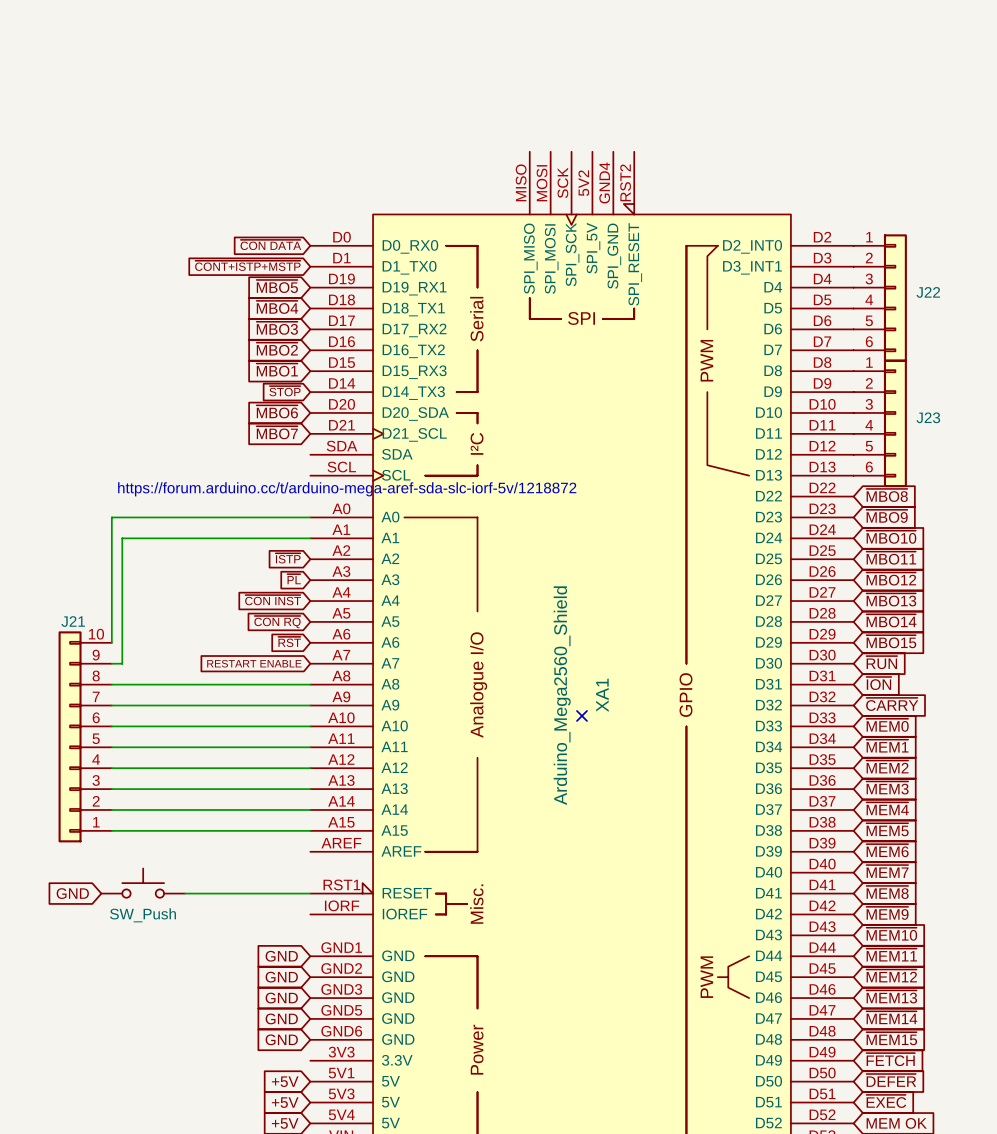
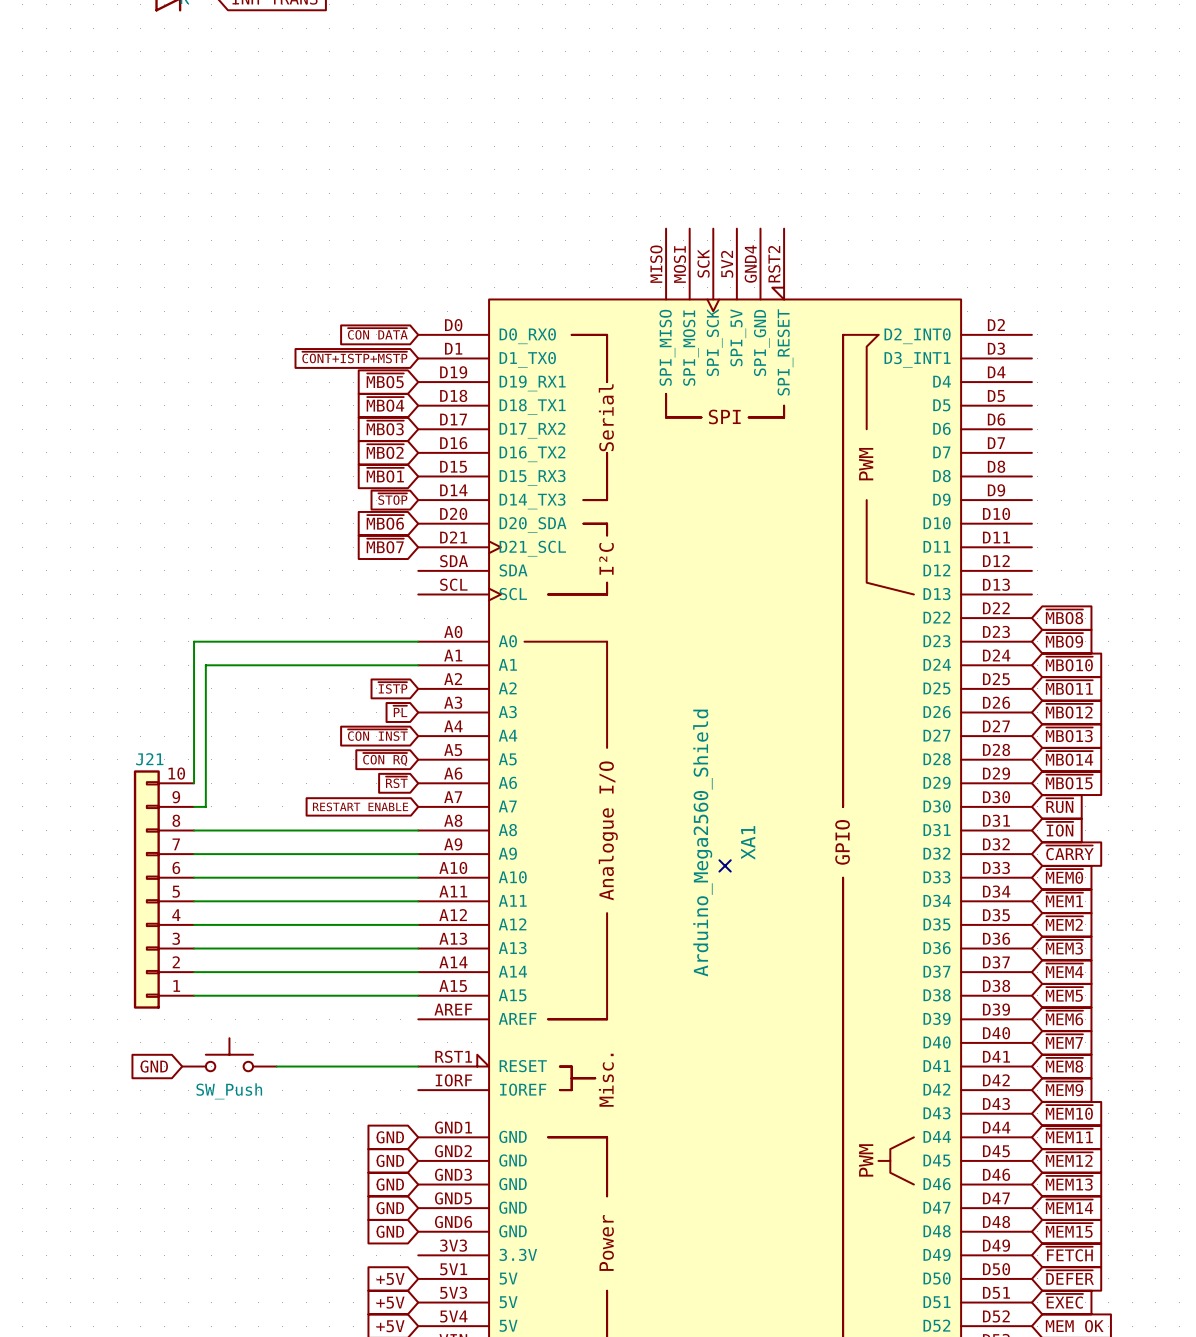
J22: (880, 298) -> none
J23: (880, 423) -> none
text: https://forum.arduino.cc/t/arduino-mega-aref-sda-slc-iorf-5v/1218872 (347, 489) -> none

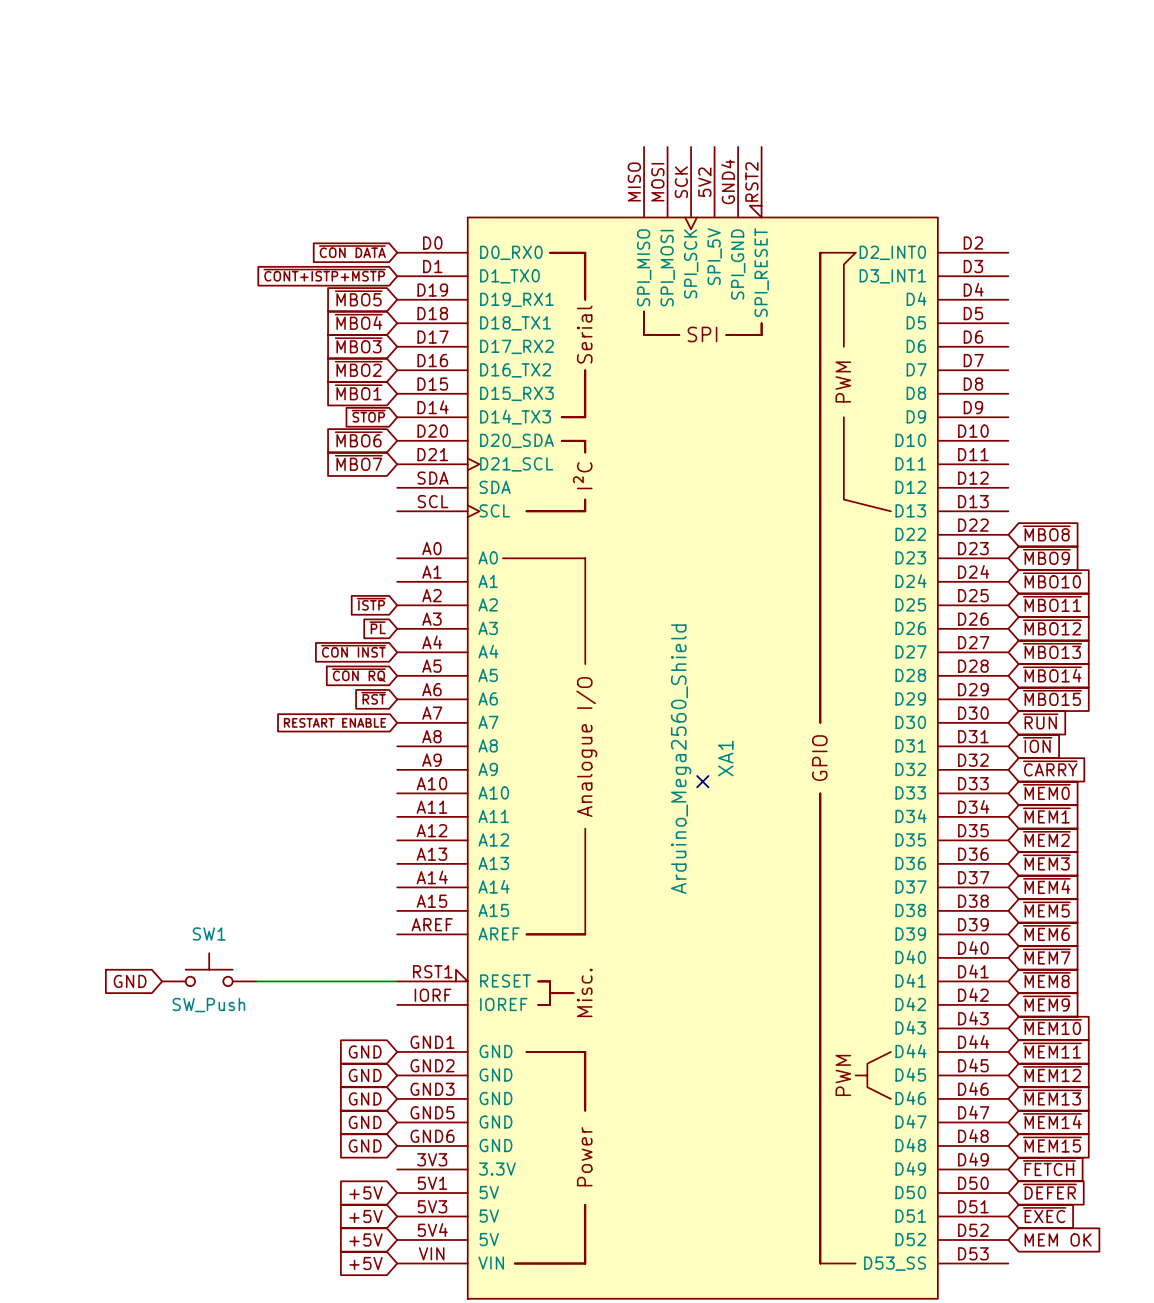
wire: (418, 641) (194, 641) (194, 783) -> none
wire: (418, 665) (205, 665) (205, 806) (194, 806) -> none
wire: (194, 830) (418, 830) -> none
wire: (194, 854) (418, 854) -> none
wire: (194, 877) (418, 877) -> none
J21: (163, 889) -> none
wire: (194, 901) (418, 901) -> none
wire: (194, 924) (418, 924) -> none
wire: (194, 948) (418, 948) -> none
wire: (194, 972) (418, 972) -> none
wire: (194, 995) (418, 995) -> none
SW1 name: none -> SW1 (209, 933)

